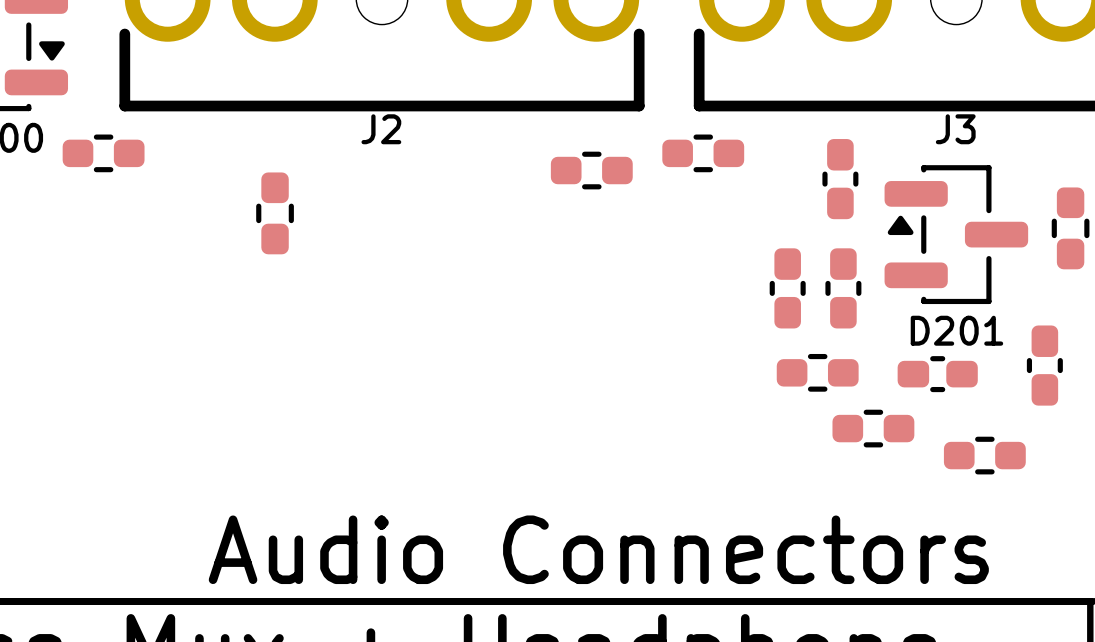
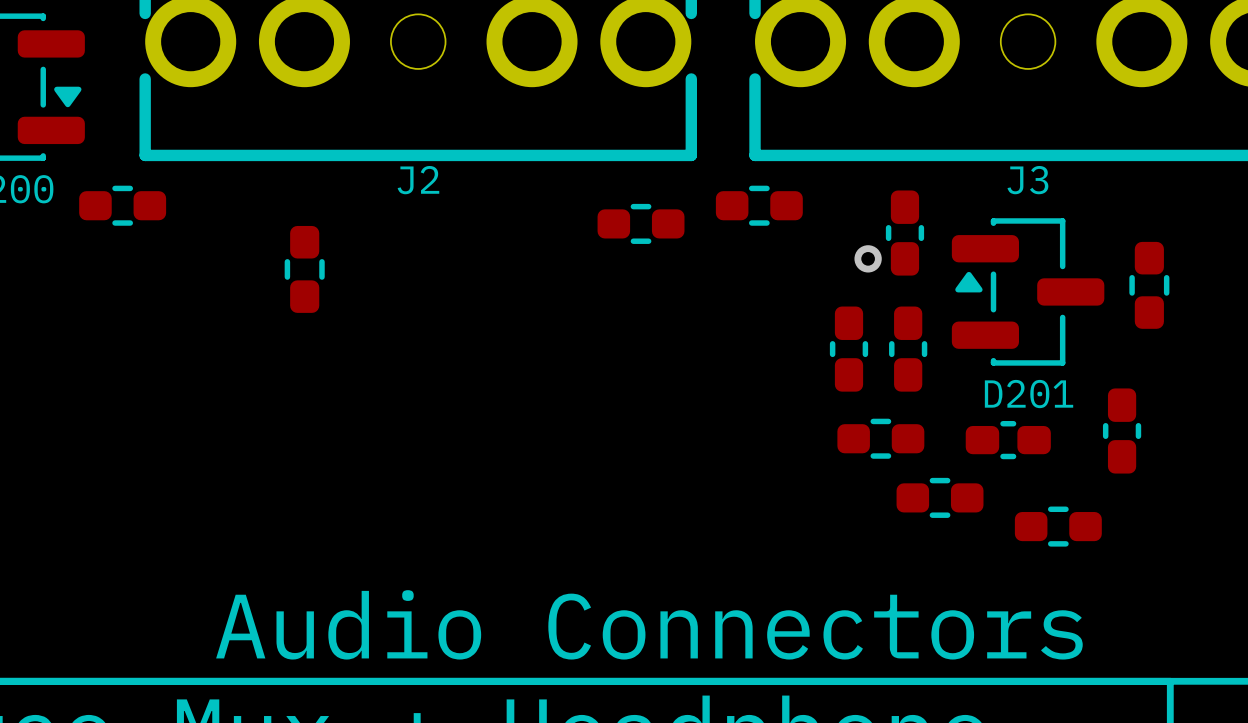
via: none -> (868, 258)

